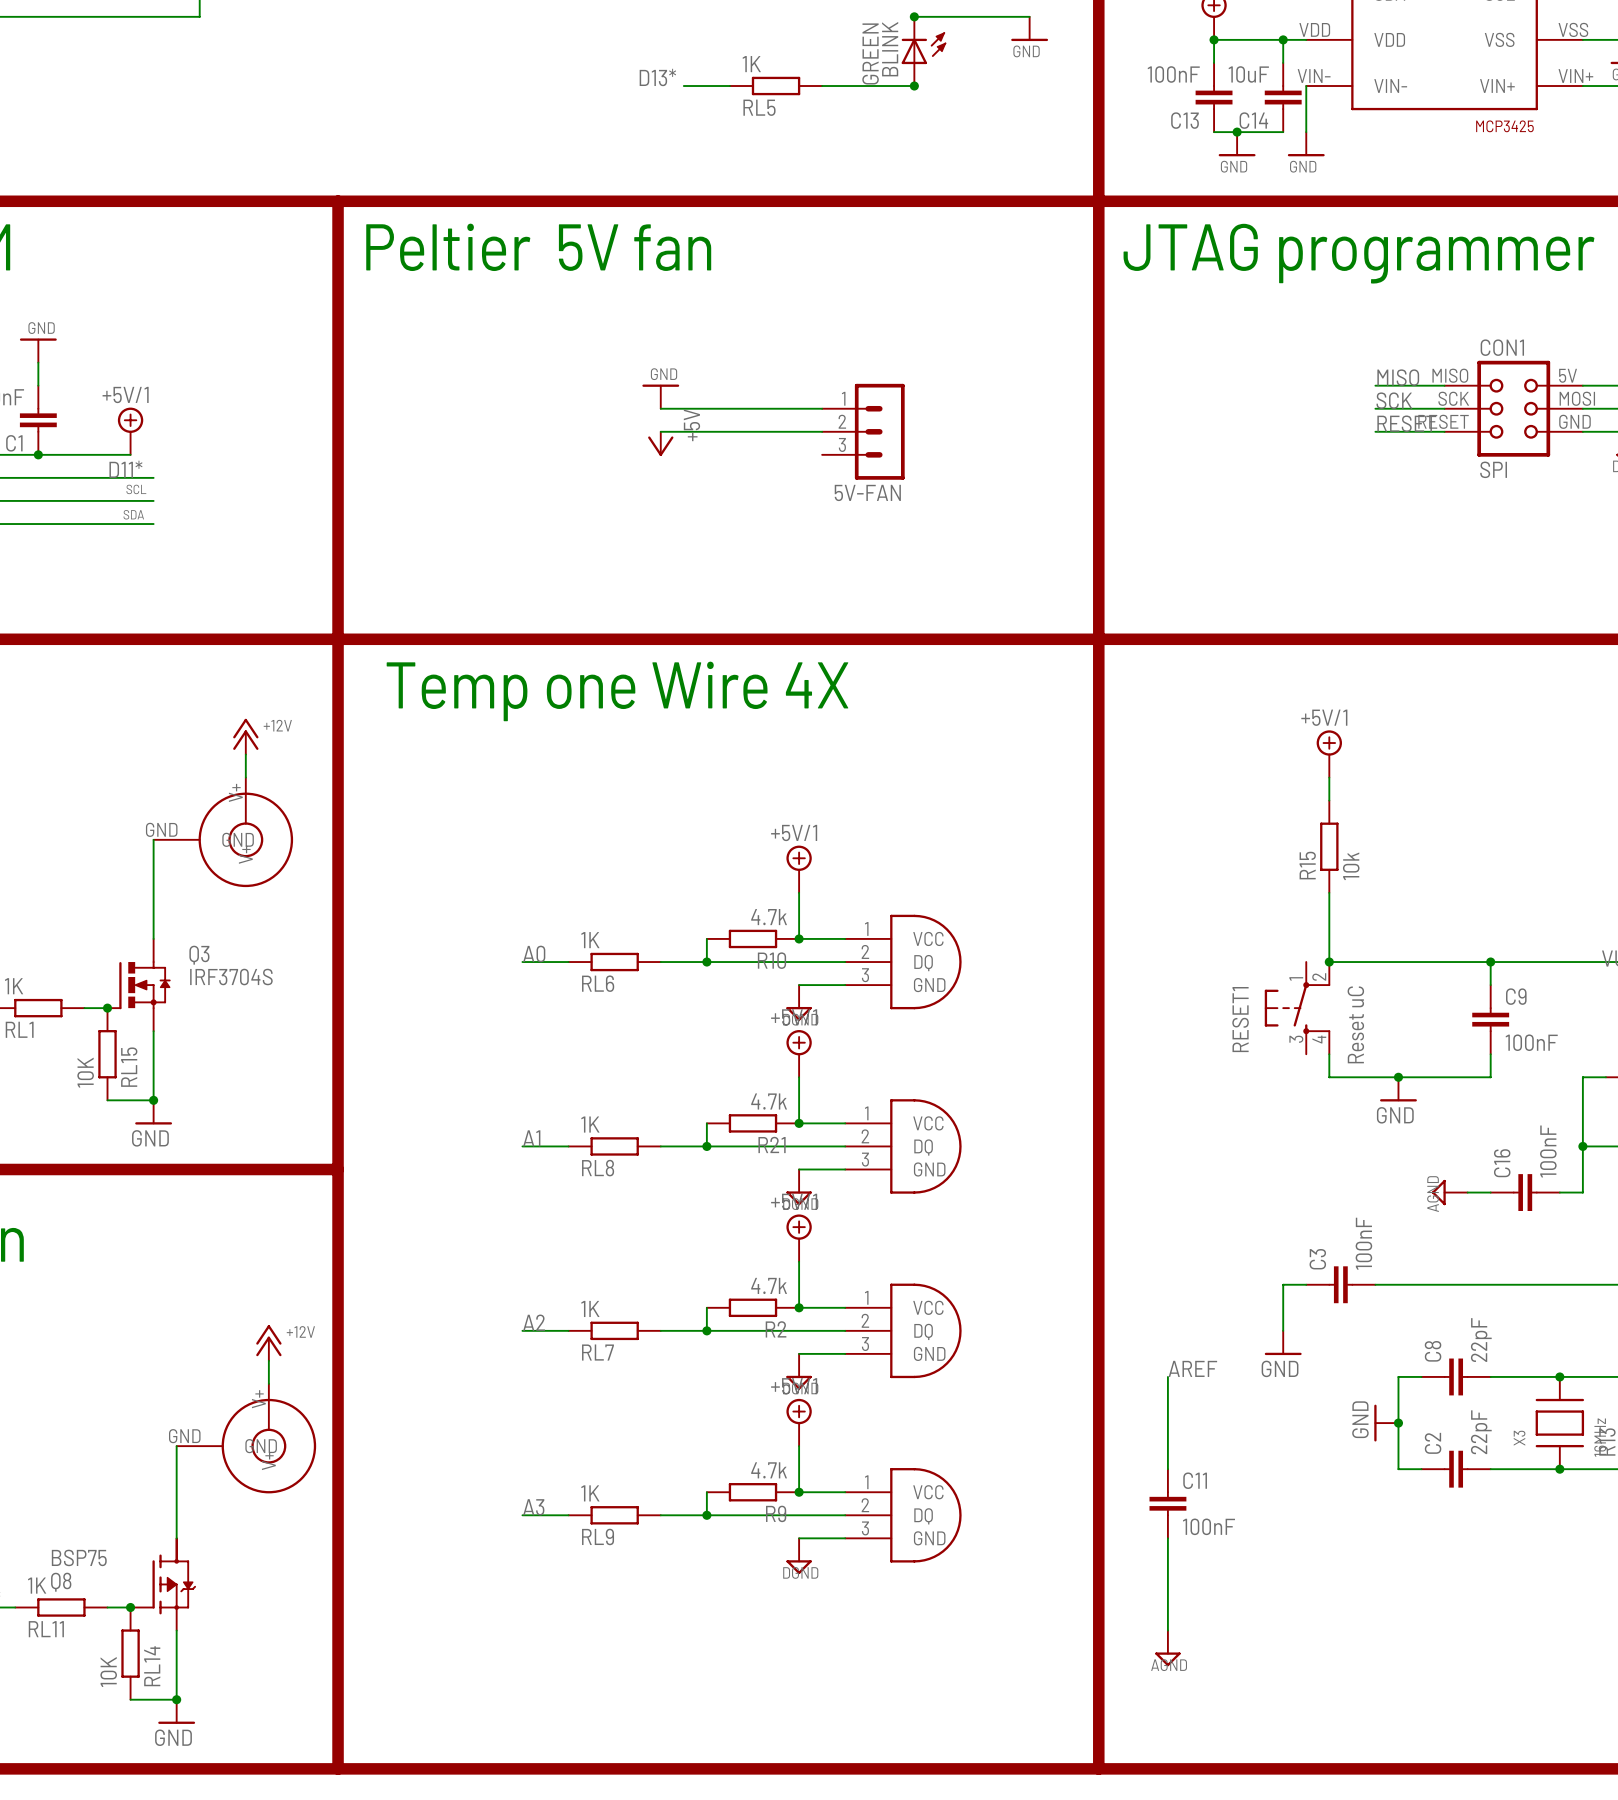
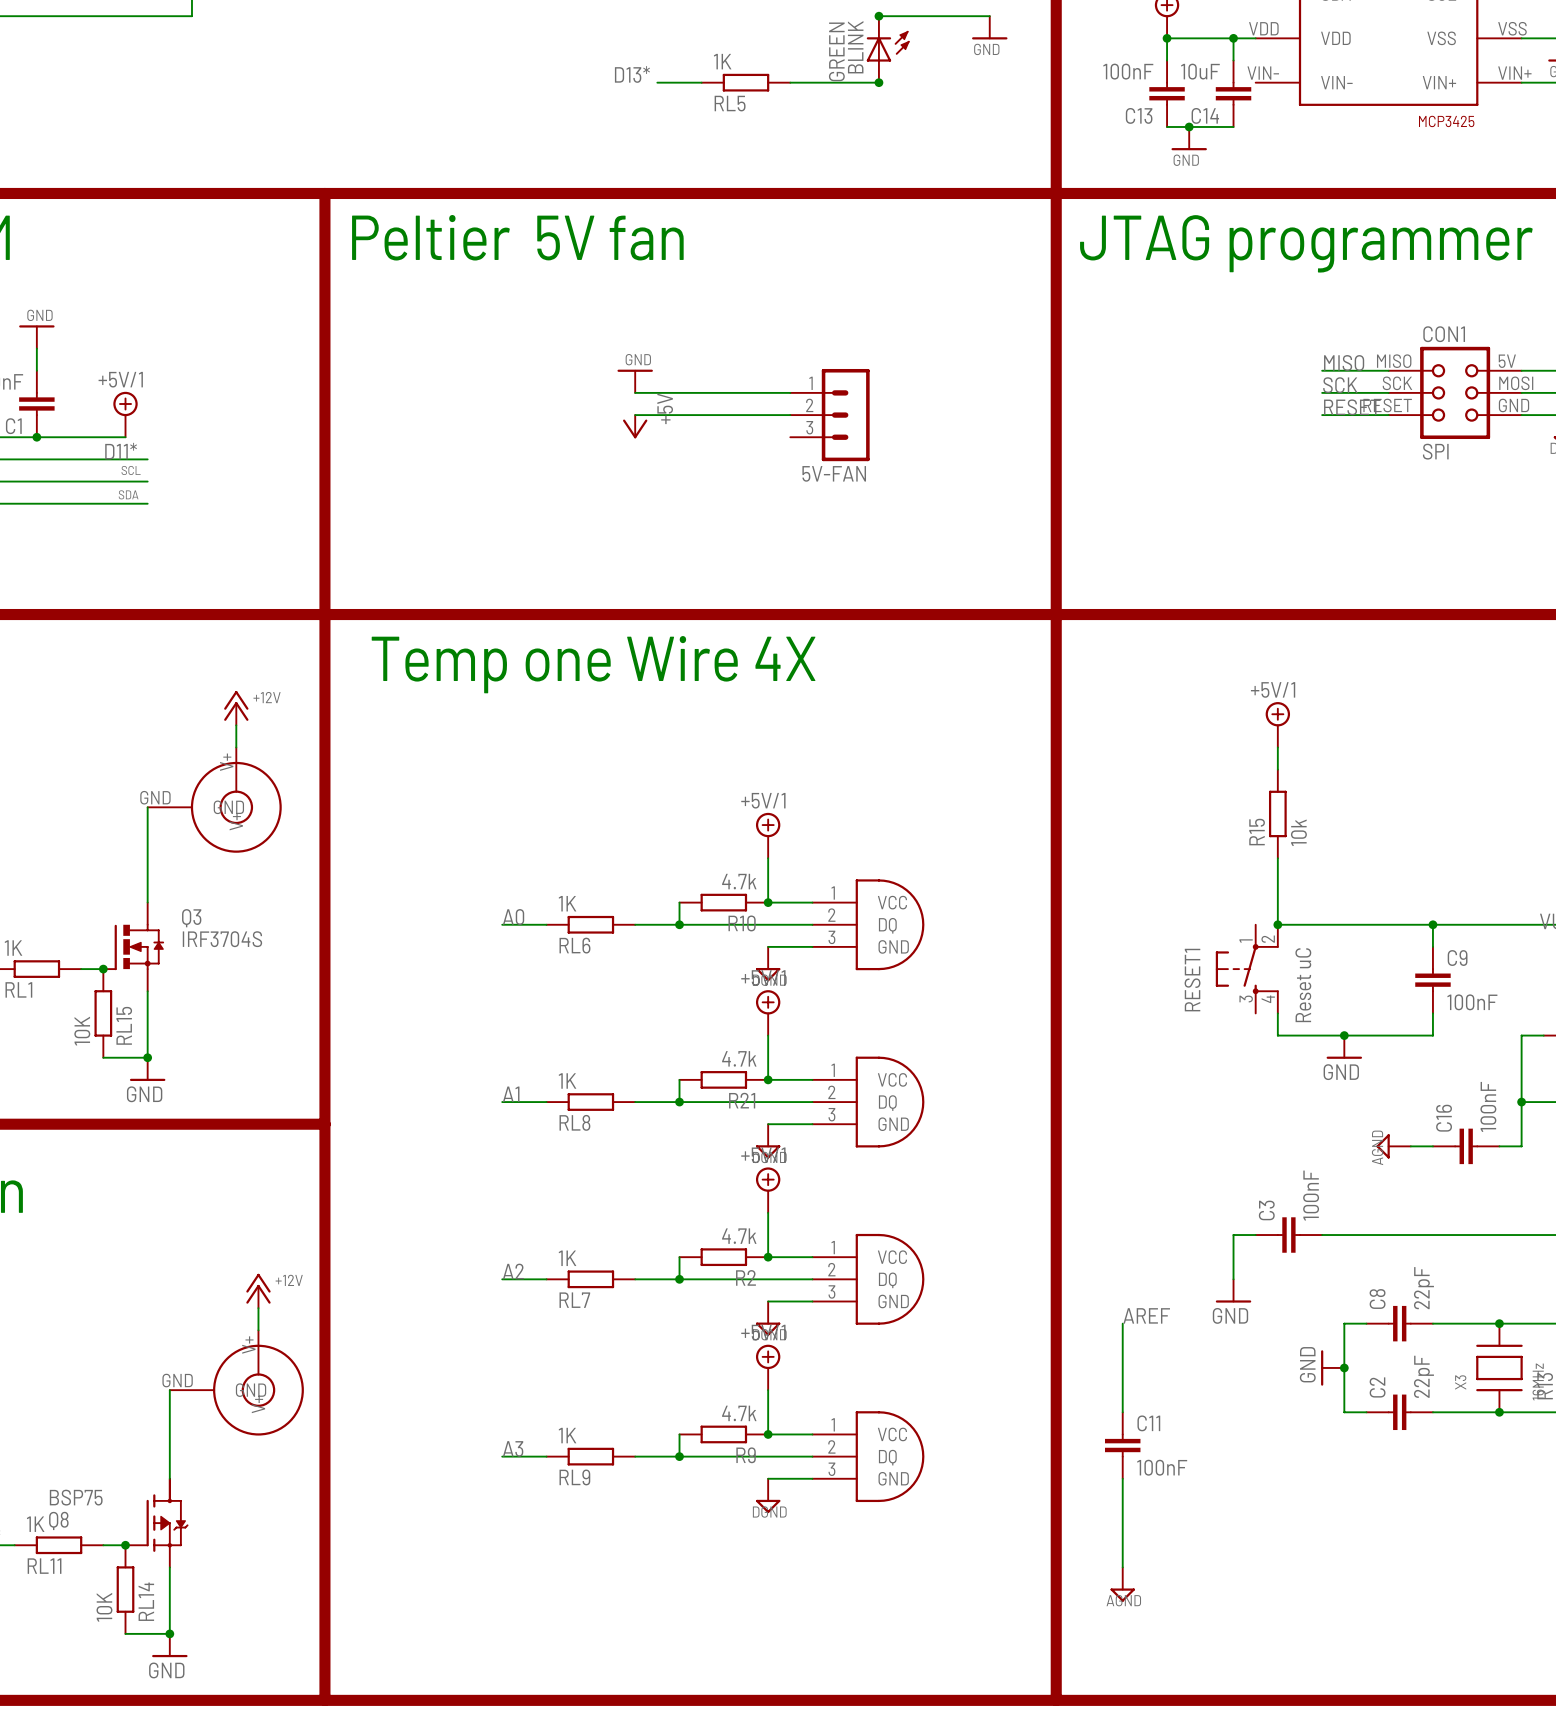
wire: (1306, 86) (1306, 132) -> none
power symbol: GND (1306, 144) -> none

